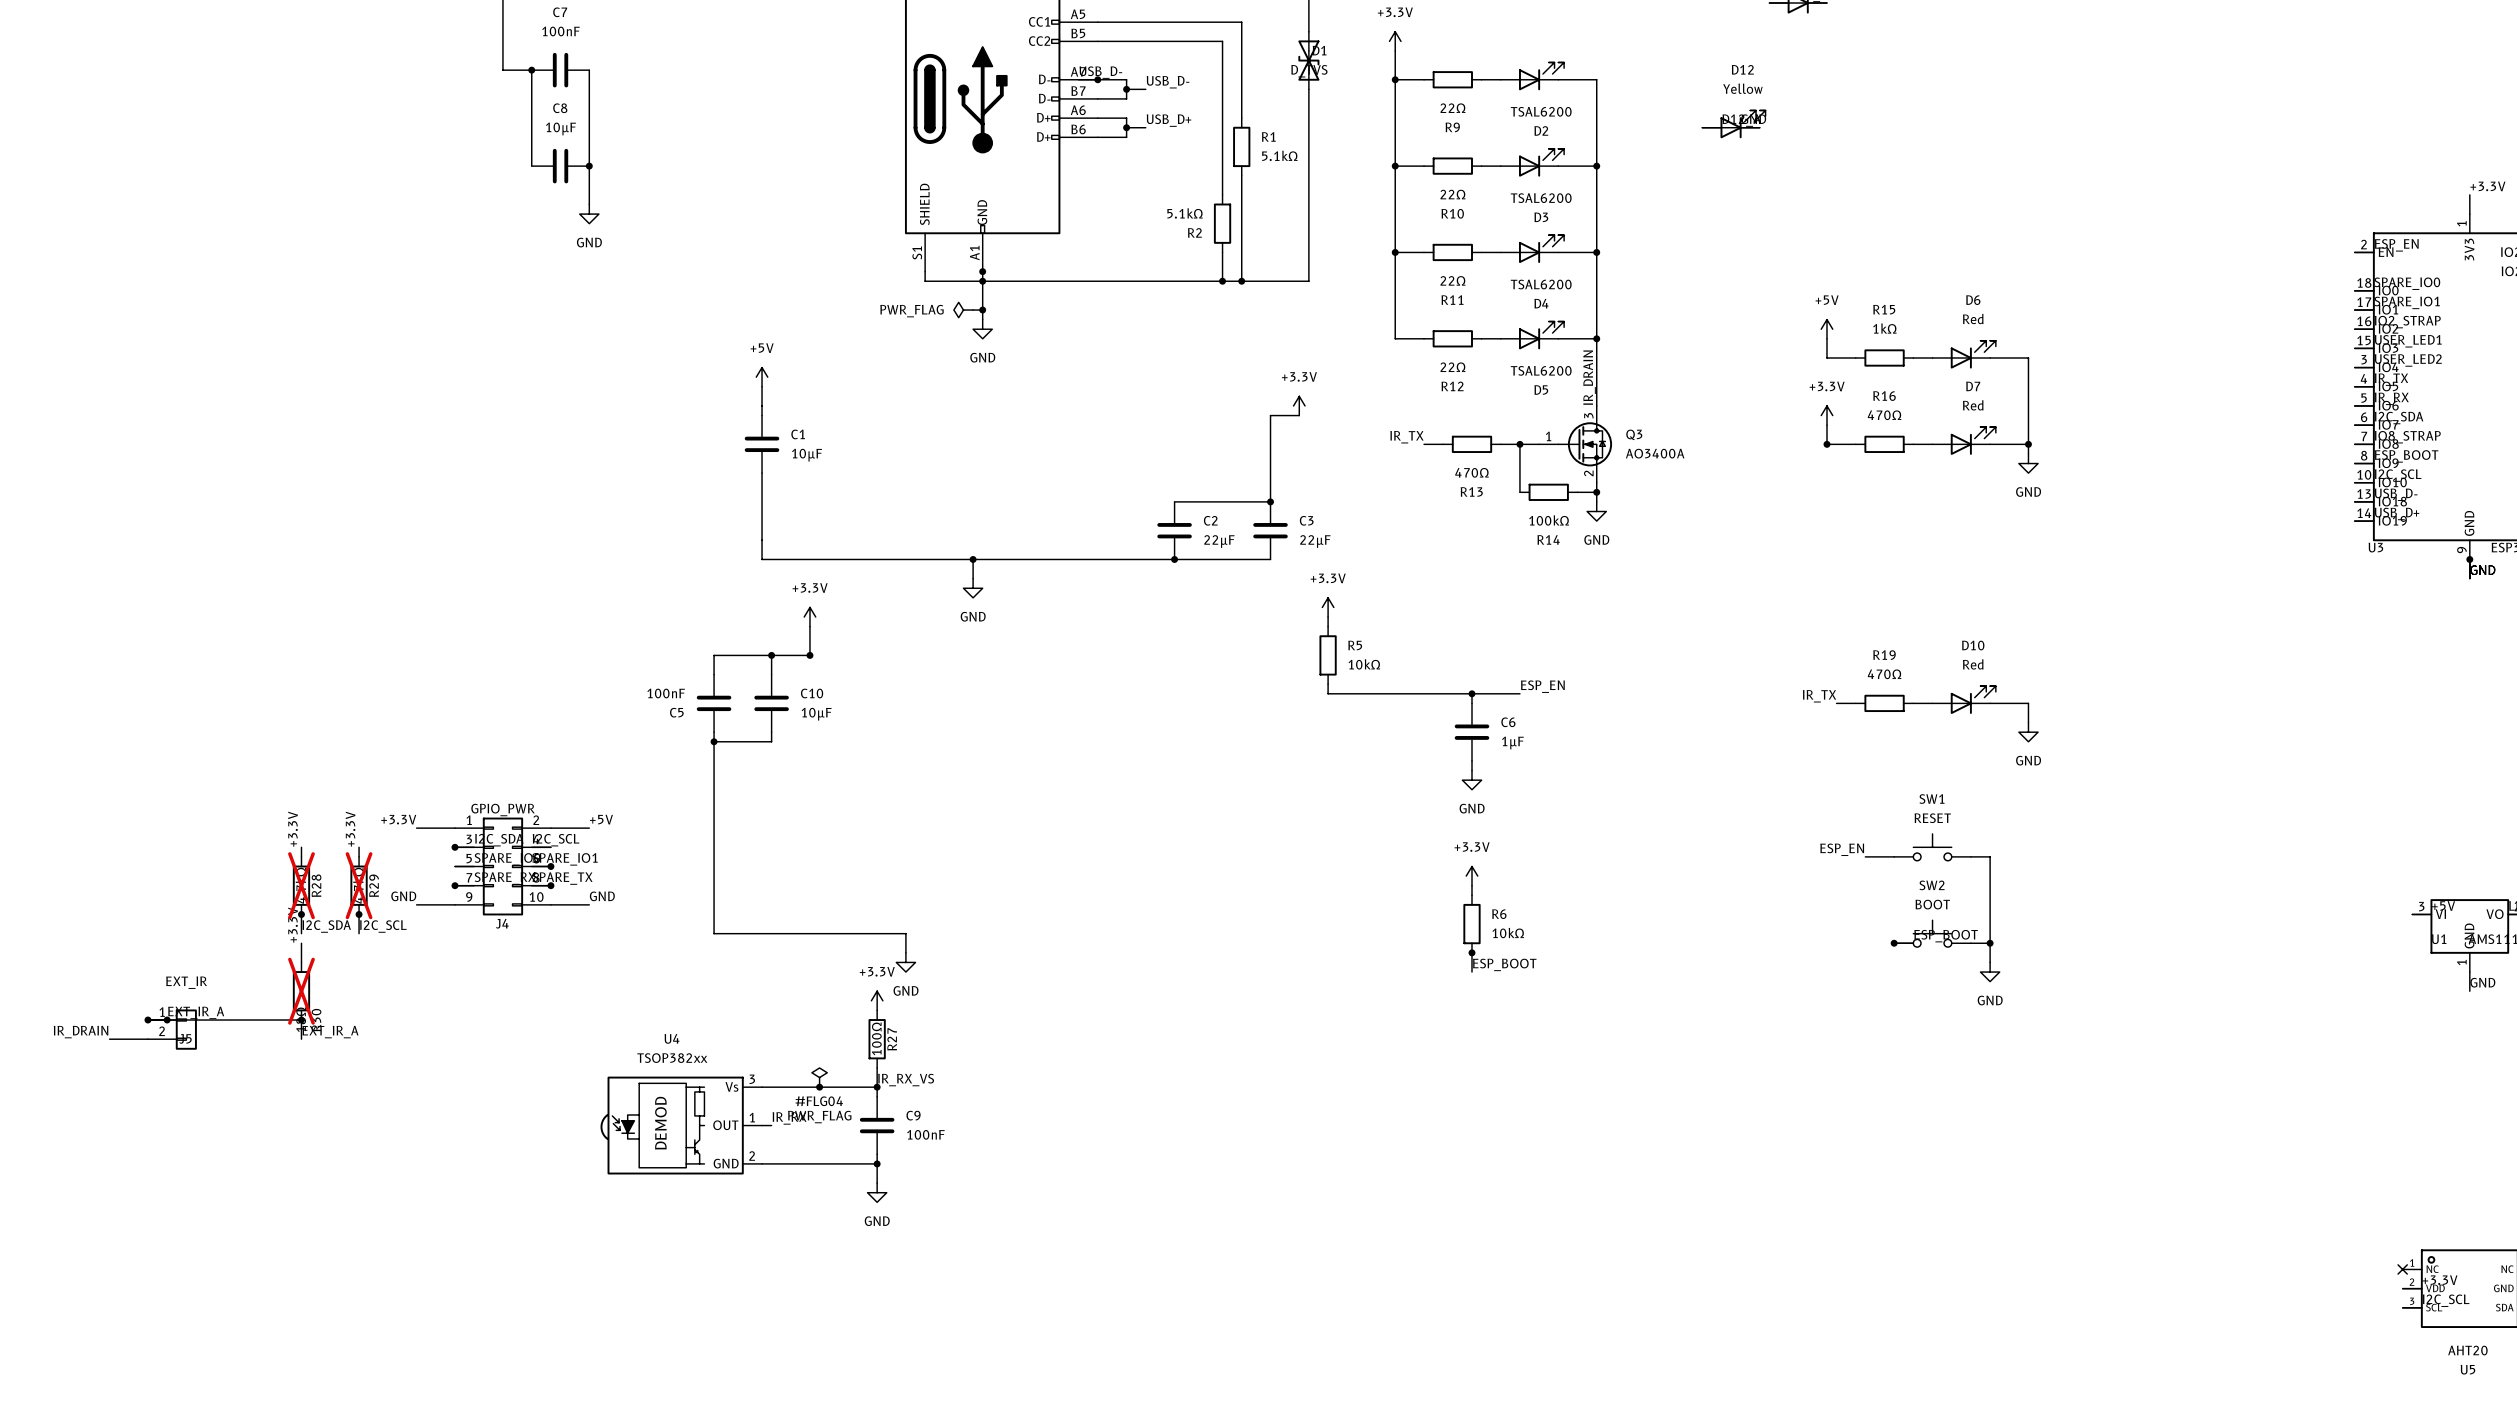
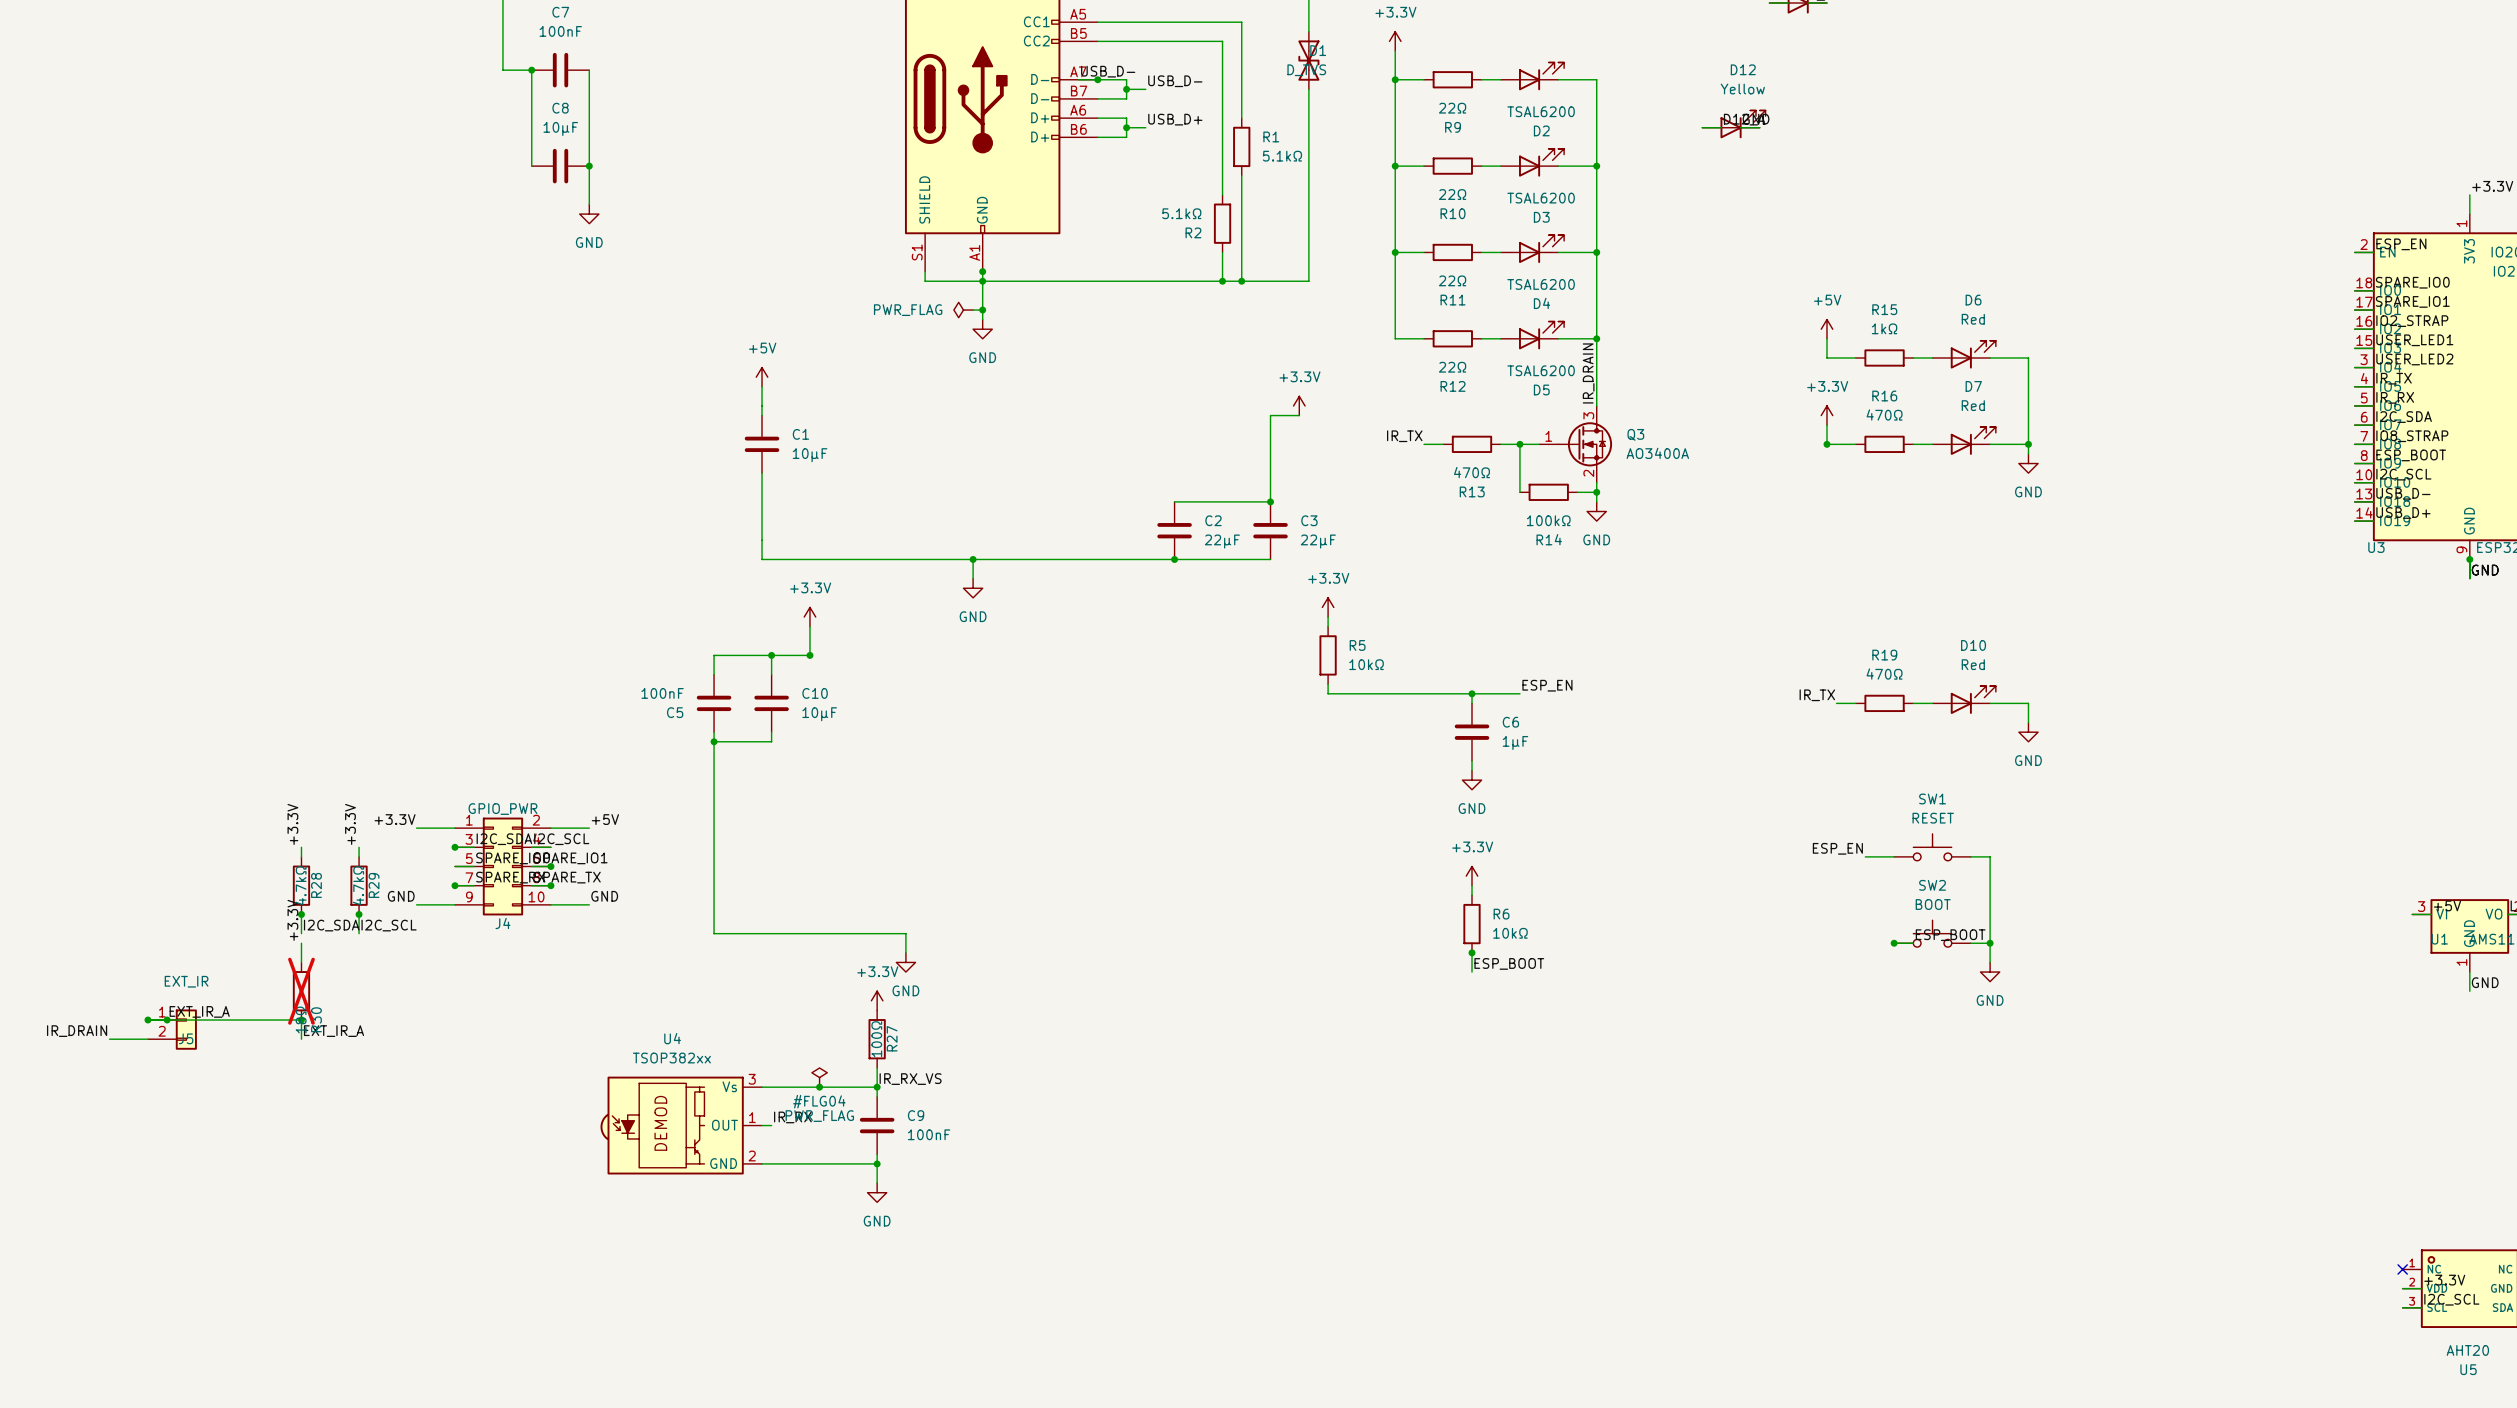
R28 do-not-place cross: (301, 885) -> none
R29 do-not-place cross: (359, 885) -> none

